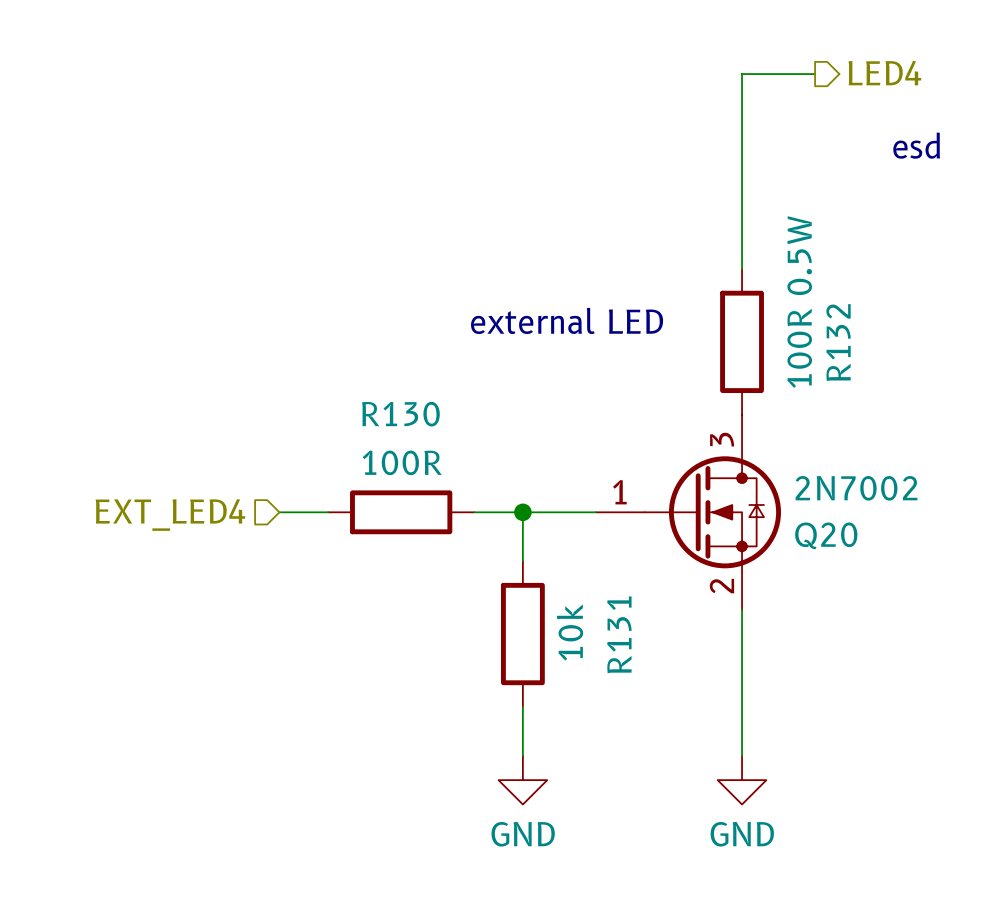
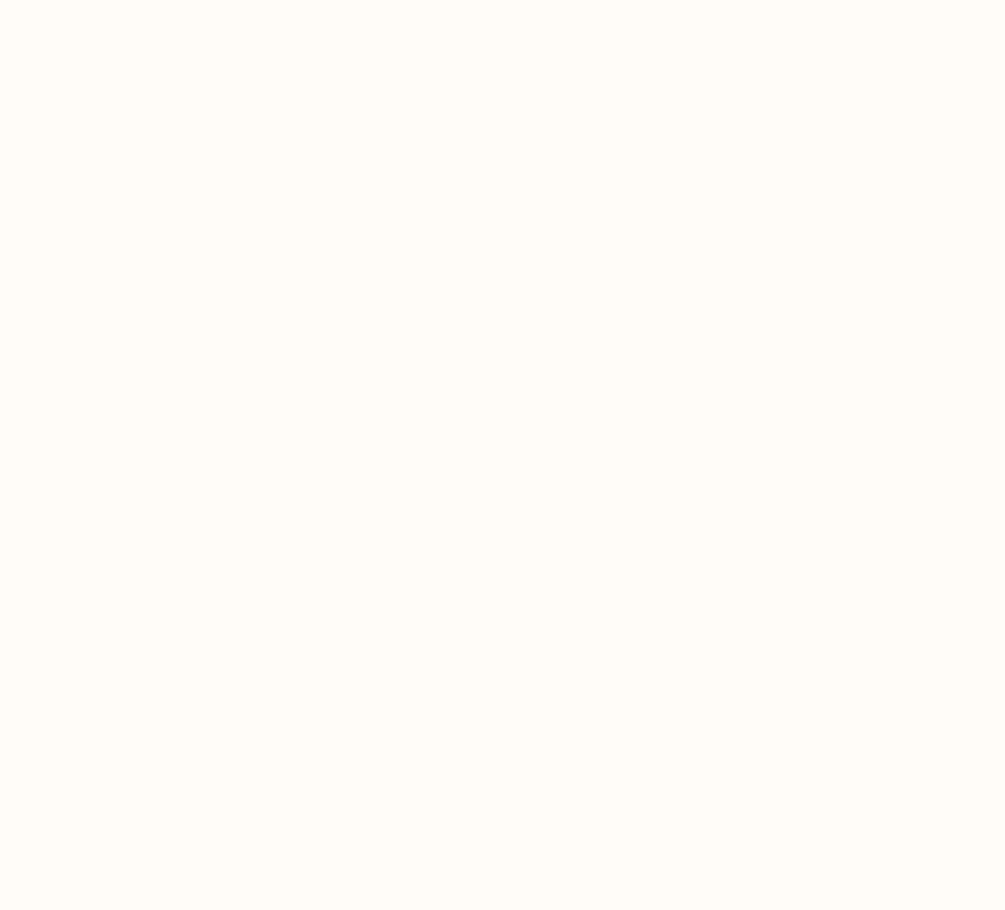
hierarchical label: LED4 (884, 73) -> none
wire: (815, 74) (742, 74) (742, 268) -> none
text: esd (916, 145) -> none
text: external LED (567, 320) -> none
R132: 100R 0.5W (742, 341) -> none
wire: (279, 512) (328, 512) -> none
R130: 100R (401, 512) -> none
wire: (474, 512) (595, 512) -> none
wire: (522, 512) (522, 561) -> none
junction: (522, 512) -> none
Q20: 2N7002 (688, 512) -> none
hierarchical label: EXT_LED4 (170, 515) -> none
wire: (742, 609) (742, 755) -> none
R131: 10k (522, 634) -> none
wire: (522, 707) (522, 755) -> none
power symbol: GND (522, 780) -> none
power symbol: GND (742, 780) -> none

